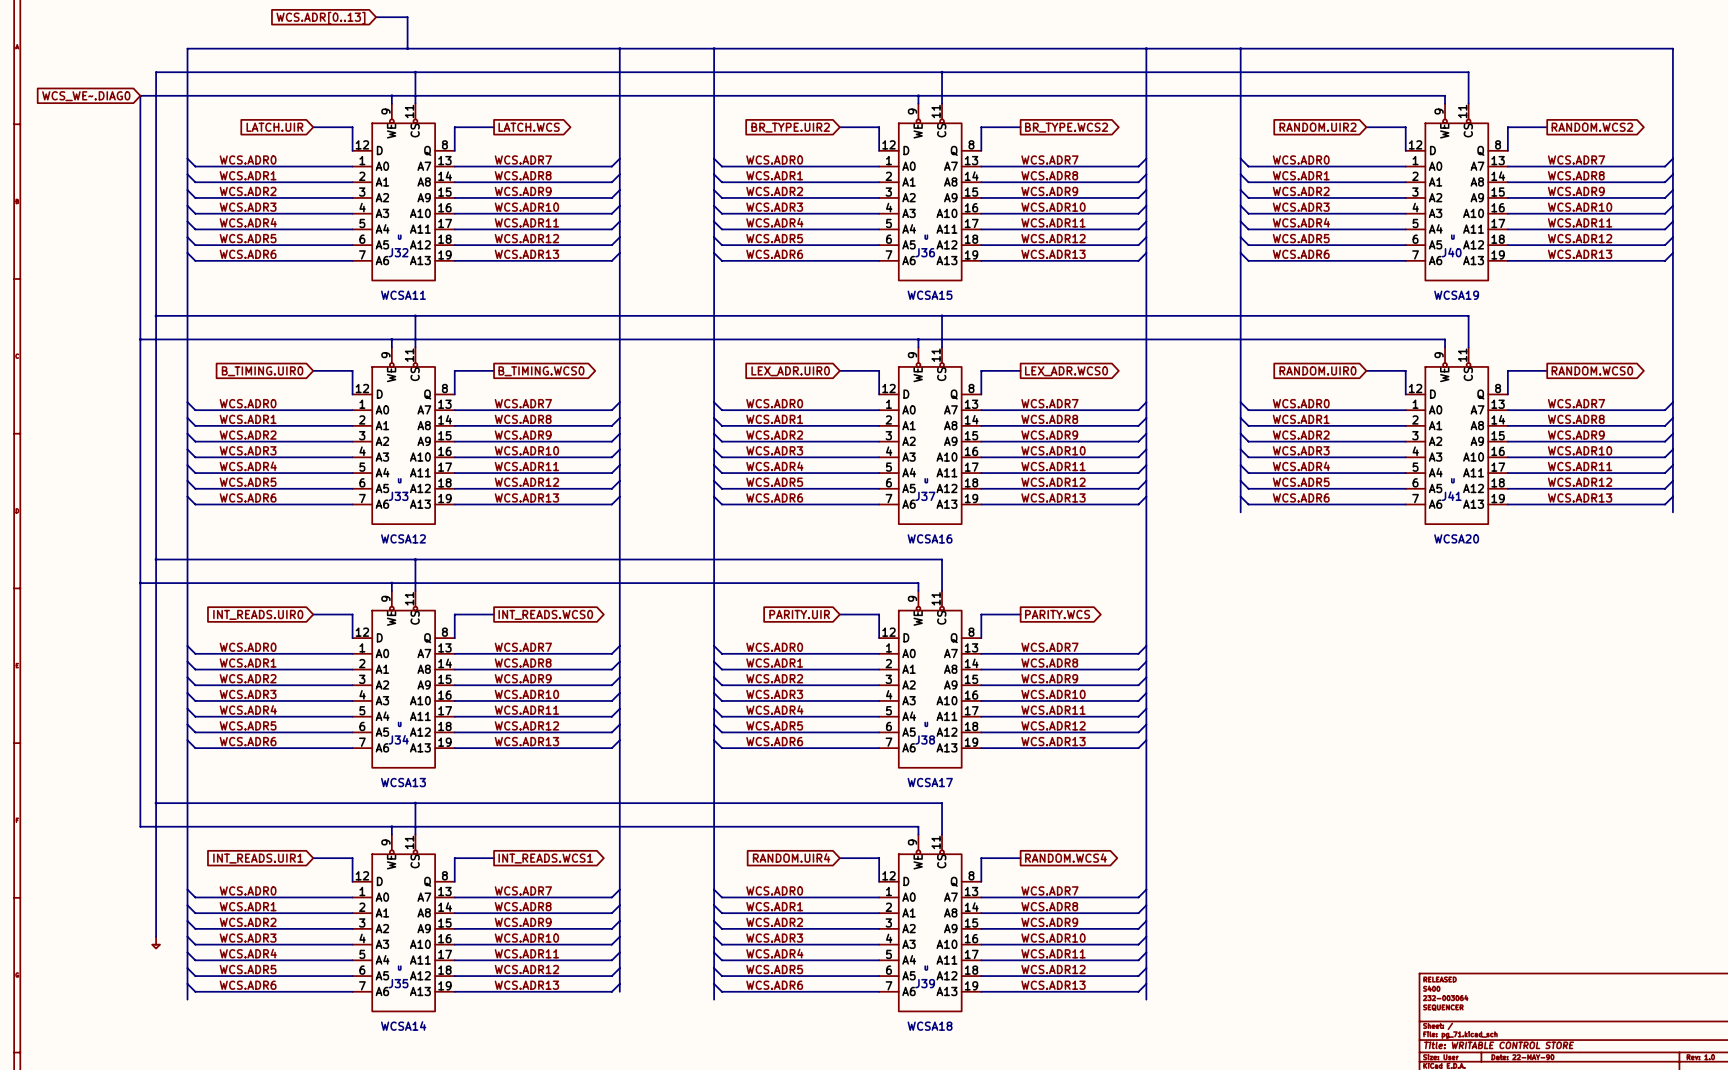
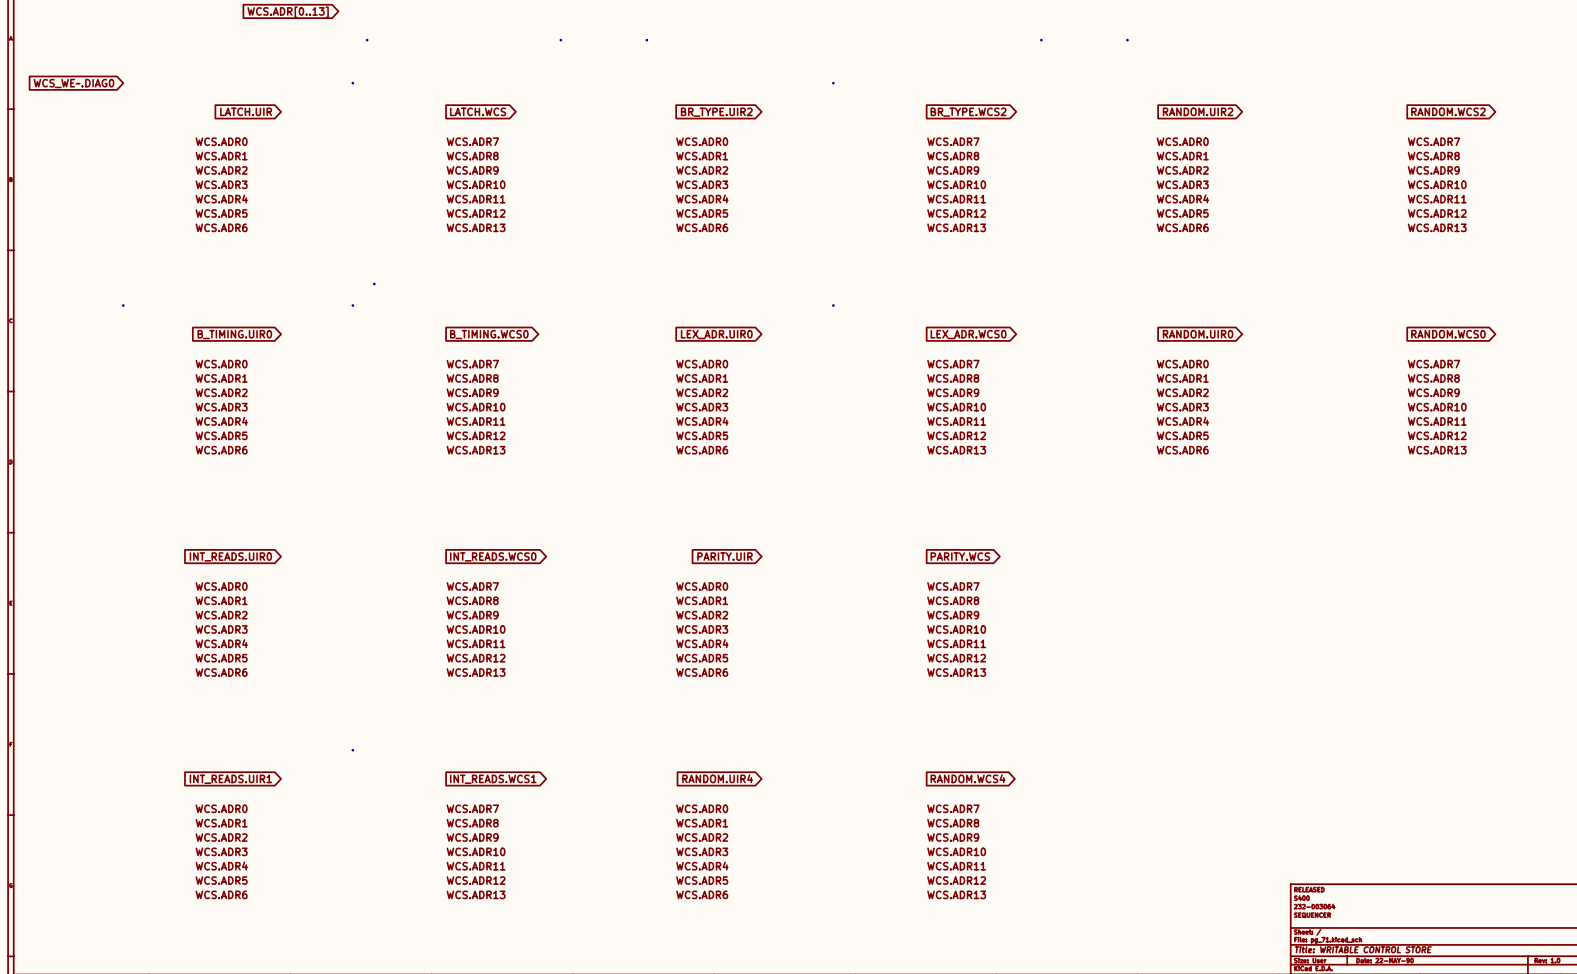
bus: (376, 17) (407, 17) (407, 48) -> none
bus: (619, 48) (619, 991) -> none
bus: (714, 48) (714, 999) -> none
bus: (1146, 48) (1146, 999) -> none
bus: (1240, 48) (1240, 512) -> none
wire: (415, 72) (415, 103) -> none
wire: (942, 72) (942, 103) -> none
wire: (391, 95) (391, 103) -> none
wire: (918, 95) (918, 103) -> none
wire: (1445, 103) (1445, 95) (140, 95) (140, 826) (918, 826) (918, 834) -> none
wire: (1468, 103) (1468, 72) (156, 72) (156, 936) -> none
wire: (313, 127) (352, 127) (352, 150) -> none
wire: (494, 127) (454, 127) (454, 150) -> none
wire: (839, 127) (879, 127) (879, 150) -> none
wire: (1020, 127) (981, 127) (981, 150) -> none
wire: (1366, 127) (1405, 127) (1405, 150) -> none
wire: (1547, 127) (1507, 127) (1507, 150) -> none
wire: (187, 158) (195, 166) (352, 166) -> none
wire: (619, 158) (611, 166) (454, 166) -> none
wire: (714, 158) (721, 166) (879, 166) -> none
wire: (1146, 158) (1138, 166) (981, 166) -> none
wire: (1240, 158) (1248, 166) (1405, 166) -> none
wire: (1672, 158) (1665, 166) (1507, 166) -> none
wire: (187, 174) (195, 182) (352, 182) -> none
wire: (619, 174) (611, 182) (454, 182) -> none
wire: (714, 174) (721, 182) (879, 182) -> none
wire: (1146, 174) (1138, 182) (981, 182) -> none
wire: (1240, 174) (1248, 182) (1405, 182) -> none
wire: (1672, 174) (1665, 182) (1507, 182) -> none
wire: (187, 190) (195, 197) (352, 197) -> none
wire: (619, 190) (611, 197) (454, 197) -> none
wire: (714, 190) (721, 197) (879, 197) -> none
wire: (1146, 190) (1138, 197) (981, 197) -> none
wire: (1240, 190) (1248, 197) (1405, 197) -> none
wire: (1672, 190) (1665, 197) (1507, 197) -> none
part: (403, 192) -> none
part: (930, 192) -> none
part: (1456, 192) -> none
wire: (187, 205) (195, 213) (352, 213) -> none
wire: (619, 205) (611, 213) (454, 213) -> none
wire: (714, 205) (721, 213) (879, 213) -> none
wire: (1146, 205) (1138, 213) (981, 213) -> none
wire: (1240, 205) (1248, 213) (1405, 213) -> none
wire: (1672, 205) (1665, 213) (1507, 213) -> none
wire: (187, 221) (195, 229) (352, 229) -> none
wire: (619, 221) (611, 229) (454, 229) -> none
wire: (714, 221) (721, 229) (879, 229) -> none
wire: (1146, 221) (1138, 229) (981, 229) -> none
wire: (1240, 221) (1248, 229) (1405, 229) -> none
wire: (1672, 221) (1665, 229) (1507, 229) -> none
wire: (187, 237) (195, 245) (352, 245) -> none
wire: (619, 237) (611, 245) (454, 245) -> none
wire: (714, 237) (721, 245) (879, 245) -> none
wire: (1146, 237) (1138, 245) (981, 245) -> none
wire: (1240, 237) (1248, 245) (1405, 245) -> none
wire: (1672, 237) (1665, 245) (1507, 245) -> none
wire: (187, 252) (195, 260) (352, 260) -> none
wire: (619, 252) (611, 260) (454, 260) -> none
wire: (714, 252) (721, 260) (879, 260) -> none
wire: (1146, 252) (1138, 260) (981, 260) -> none
wire: (1240, 252) (1248, 260) (1405, 260) -> none
wire: (1672, 252) (1665, 260) (1507, 260) -> none
wire: (156, 315) (1468, 315) (1468, 347) -> none
wire: (415, 315) (415, 347) -> none
wire: (942, 315) (942, 347) -> none
wire: (140, 339) (1445, 339) (1445, 347) -> none
wire: (391, 339) (391, 347) -> none
wire: (918, 339) (918, 347) -> none
wire: (313, 370) (352, 370) (352, 394) -> none
wire: (494, 370) (454, 370) (454, 394) -> none
wire: (839, 370) (879, 370) (879, 394) -> none
wire: (1020, 370) (981, 370) (981, 394) -> none
wire: (1366, 370) (1405, 370) (1405, 394) -> none
wire: (1547, 370) (1507, 370) (1507, 394) -> none
wire: (187, 402) (195, 410) (352, 410) -> none
wire: (619, 402) (611, 410) (454, 410) -> none
wire: (714, 402) (721, 410) (879, 410) -> none
wire: (1146, 402) (1138, 410) (981, 410) -> none
wire: (1240, 402) (1248, 410) (1405, 410) -> none
wire: (1672, 402) (1665, 410) (1507, 410) -> none
wire: (187, 418) (195, 425) (352, 425) -> none
wire: (619, 418) (611, 425) (454, 425) -> none
wire: (714, 418) (721, 425) (879, 425) -> none
wire: (1146, 418) (1138, 425) (981, 425) -> none
wire: (1240, 418) (1248, 425) (1405, 425) -> none
wire: (1672, 418) (1665, 425) (1507, 425) -> none
wire: (187, 433) (195, 441) (352, 441) -> none
wire: (619, 433) (611, 441) (454, 441) -> none
wire: (714, 433) (721, 441) (879, 441) -> none
wire: (1146, 433) (1138, 441) (981, 441) -> none
wire: (1240, 433) (1248, 441) (1405, 441) -> none
wire: (1672, 433) (1665, 441) (1507, 441) -> none
part: (403, 435) -> none
part: (930, 435) -> none
part: (1456, 435) -> none
wire: (187, 449) (195, 457) (352, 457) -> none
wire: (619, 449) (611, 457) (454, 457) -> none
wire: (714, 449) (721, 457) (879, 457) -> none
wire: (1146, 449) (1138, 457) (981, 457) -> none
wire: (1240, 449) (1248, 457) (1405, 457) -> none
wire: (1672, 449) (1665, 457) (1507, 457) -> none
wire: (187, 465) (195, 473) (352, 473) -> none
wire: (619, 465) (611, 473) (454, 473) -> none
wire: (714, 465) (721, 473) (879, 473) -> none
wire: (1146, 465) (1138, 473) (981, 473) -> none
wire: (1240, 465) (1248, 473) (1405, 473) -> none
wire: (1672, 465) (1665, 473) (1507, 473) -> none
wire: (187, 480) (195, 488) (352, 488) -> none
wire: (619, 480) (611, 488) (454, 488) -> none
wire: (714, 480) (721, 488) (879, 488) -> none
wire: (1146, 480) (1138, 488) (981, 488) -> none
wire: (1240, 480) (1248, 488) (1405, 488) -> none
wire: (1672, 480) (1665, 488) (1507, 488) -> none
wire: (187, 496) (195, 504) (352, 504) -> none
wire: (619, 496) (611, 504) (454, 504) -> none
wire: (714, 496) (721, 504) (879, 504) -> none
wire: (1146, 496) (1138, 504) (981, 504) -> none
wire: (1240, 496) (1248, 504) (1405, 504) -> none
wire: (1672, 496) (1665, 504) (1507, 504) -> none
bus: (1672, 512) (1672, 48) (187, 48) (187, 999) -> none
wire: (156, 559) (942, 559) (942, 590) -> none
wire: (415, 559) (415, 590) -> none
wire: (140, 583) (918, 583) (918, 590) -> none
wire: (391, 583) (391, 590) -> none
wire: (313, 614) (352, 614) (352, 638) -> none
wire: (494, 614) (454, 614) (454, 638) -> none
wire: (839, 614) (879, 614) (879, 638) -> none
wire: (1020, 614) (981, 614) (981, 638) -> none
wire: (187, 645) (195, 653) (352, 653) -> none
wire: (619, 645) (611, 653) (454, 653) -> none
wire: (714, 645) (721, 653) (879, 653) -> none
wire: (1146, 645) (1138, 653) (981, 653) -> none
wire: (187, 661) (195, 669) (352, 669) -> none
wire: (619, 661) (611, 669) (454, 669) -> none
wire: (714, 661) (721, 669) (879, 669) -> none
wire: (1146, 661) (1138, 669) (981, 669) -> none
wire: (187, 677) (195, 685) (352, 685) -> none
wire: (619, 677) (611, 685) (454, 685) -> none
wire: (714, 677) (721, 685) (879, 685) -> none
wire: (1146, 677) (1138, 685) (981, 685) -> none
part: (403, 679) -> none
part: (930, 679) -> none
wire: (187, 693) (195, 700) (352, 700) -> none
wire: (619, 693) (611, 700) (454, 700) -> none
wire: (714, 693) (721, 700) (879, 700) -> none
wire: (1146, 693) (1138, 700) (981, 700) -> none
wire: (187, 708) (195, 716) (352, 716) -> none
wire: (619, 708) (611, 716) (454, 716) -> none
wire: (714, 708) (721, 716) (879, 716) -> none
wire: (1146, 708) (1138, 716) (981, 716) -> none
wire: (187, 724) (195, 732) (352, 732) -> none
wire: (619, 724) (611, 732) (454, 732) -> none
wire: (714, 724) (721, 732) (879, 732) -> none
wire: (1146, 724) (1138, 732) (981, 732) -> none
wire: (187, 740) (195, 748) (352, 748) -> none
wire: (619, 740) (611, 748) (454, 748) -> none
wire: (714, 740) (721, 748) (879, 748) -> none
wire: (1146, 740) (1138, 748) (981, 748) -> none
wire: (156, 803) (942, 803) (942, 834) -> none
wire: (415, 803) (415, 834) -> none
wire: (391, 826) (391, 834) -> none
wire: (313, 858) (352, 858) (352, 881) -> none
wire: (494, 858) (454, 858) (454, 881) -> none
wire: (839, 858) (879, 858) (879, 881) -> none
wire: (1020, 858) (981, 858) (981, 881) -> none
wire: (187, 889) (195, 897) (352, 897) -> none
wire: (619, 889) (611, 897) (454, 897) -> none
wire: (714, 889) (721, 897) (879, 897) -> none
wire: (1146, 889) (1138, 897) (981, 897) -> none
wire: (187, 905) (195, 913) (352, 913) -> none
wire: (619, 905) (611, 913) (454, 913) -> none
wire: (714, 905) (721, 913) (879, 913) -> none
wire: (1146, 905) (1138, 913) (981, 913) -> none
wire: (187, 921) (195, 928) (352, 928) -> none
wire: (619, 921) (611, 928) (454, 928) -> none
wire: (714, 921) (721, 928) (879, 928) -> none
wire: (1146, 921) (1138, 928) (981, 928) -> none
part: (403, 923) -> none
part: (930, 923) -> none
wire: (187, 936) (195, 944) (352, 944) -> none
wire: (619, 936) (611, 944) (454, 944) -> none
wire: (714, 936) (721, 944) (879, 944) -> none
wire: (1146, 936) (1138, 944) (981, 944) -> none
power symbol: (156, 942) -> none
wire: (187, 952) (195, 960) (352, 960) -> none
wire: (619, 952) (611, 960) (454, 960) -> none
wire: (714, 952) (721, 960) (879, 960) -> none
wire: (1146, 952) (1138, 960) (981, 960) -> none
wire: (187, 968) (195, 976) (352, 976) -> none
wire: (619, 968) (611, 976) (454, 976) -> none
wire: (714, 968) (721, 976) (879, 976) -> none
wire: (1146, 968) (1138, 976) (981, 976) -> none
wire: (187, 983) (195, 991) (352, 991) -> none
wire: (619, 983) (611, 991) (454, 991) -> none
wire: (714, 983) (721, 991) (879, 991) -> none
wire: (1146, 983) (1138, 991) (981, 991) -> none

